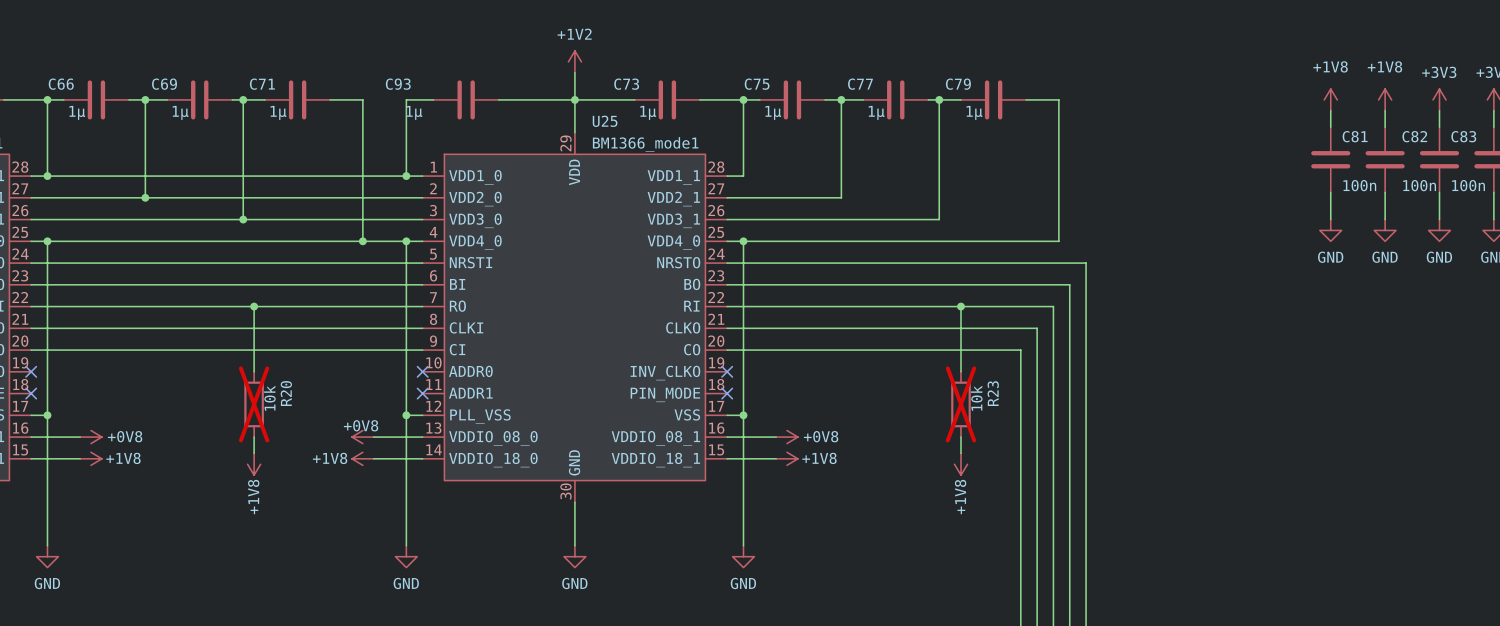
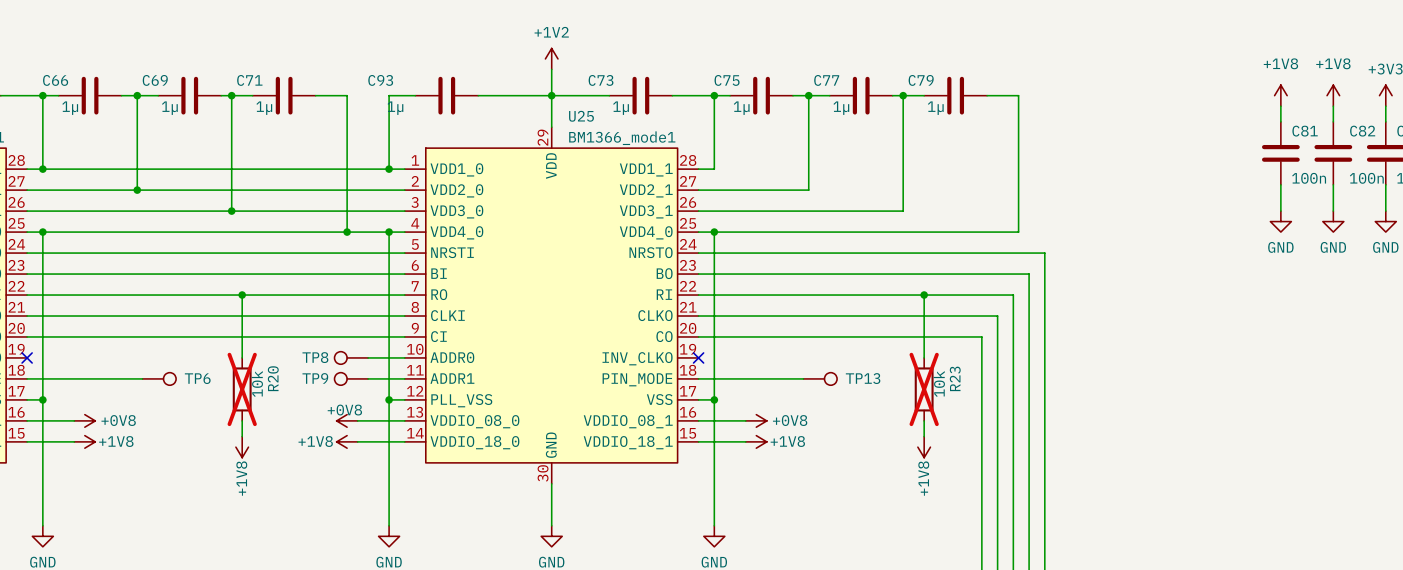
TP8: none -> (351, 357)
wire: none -> (368, 357) (404, 357)
no-connect mark: (422, 371) -> none
wire: none -> (27, 378) (142, 378)
no-connect mark: (31, 393) -> none
TP6: none -> (159, 378)
TP9: none -> (351, 378)
wire: none -> (368, 378) (404, 378)
no-connect mark: (422, 393) -> none
wire: none -> (698, 378) (803, 378)
no-connect mark: (727, 393) -> none
TP13: none -> (820, 378)

